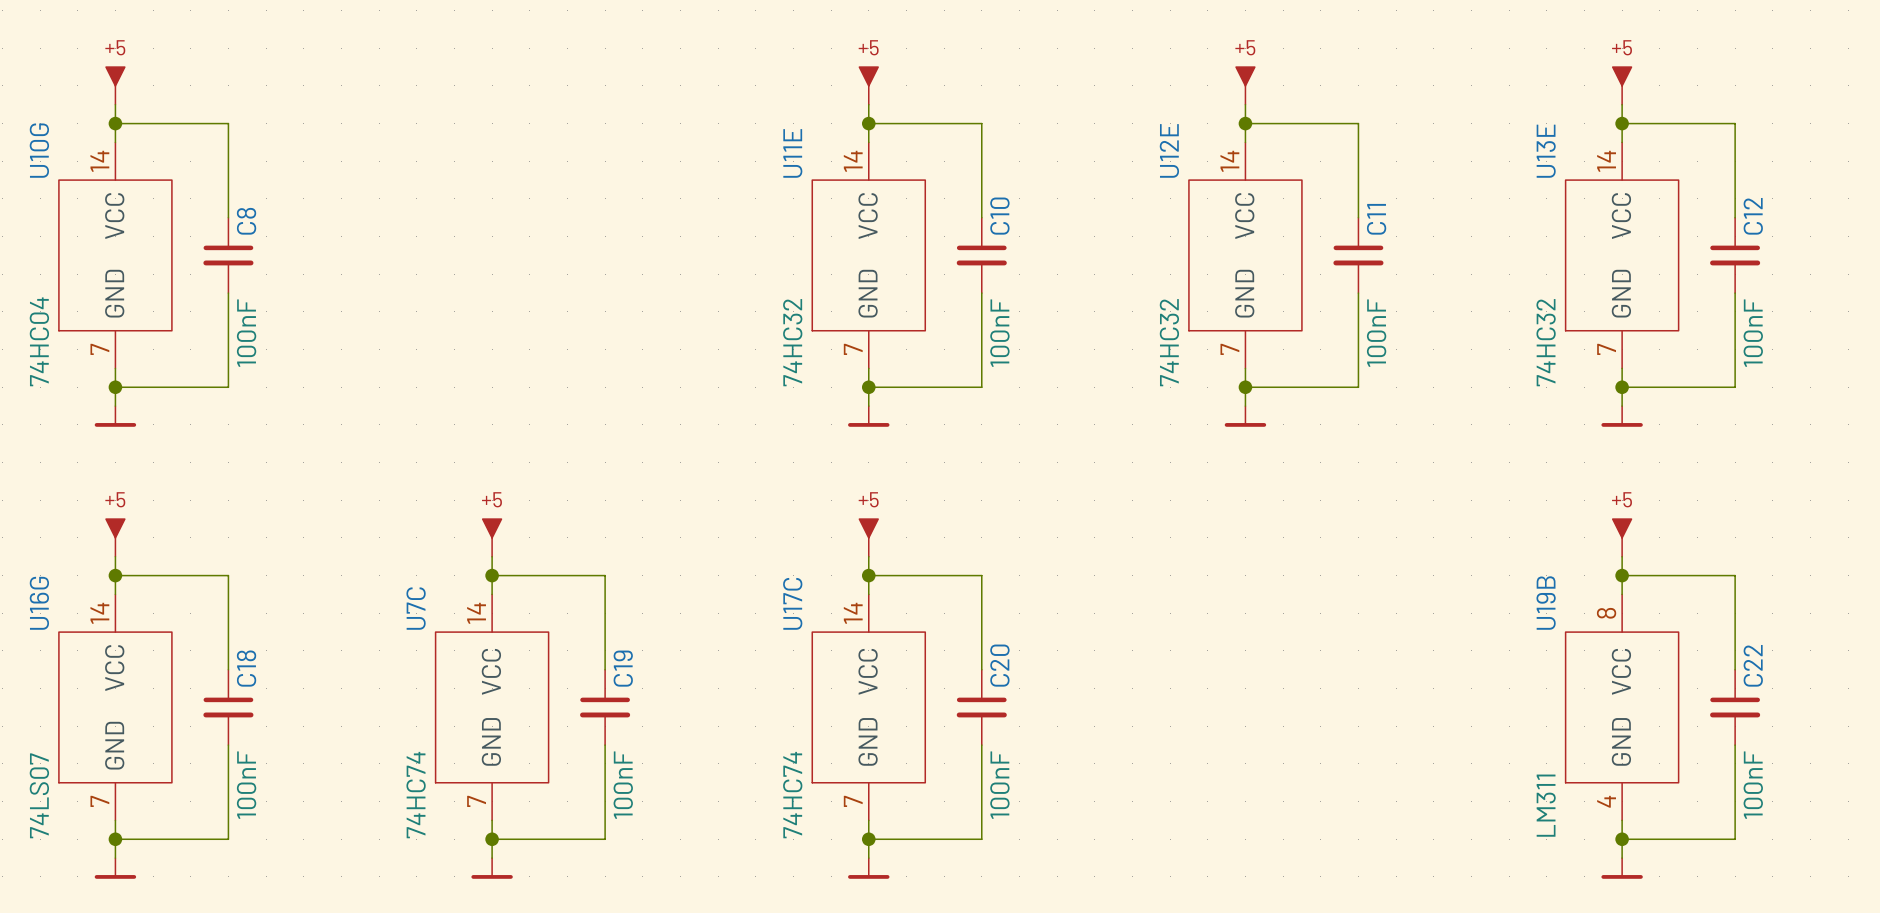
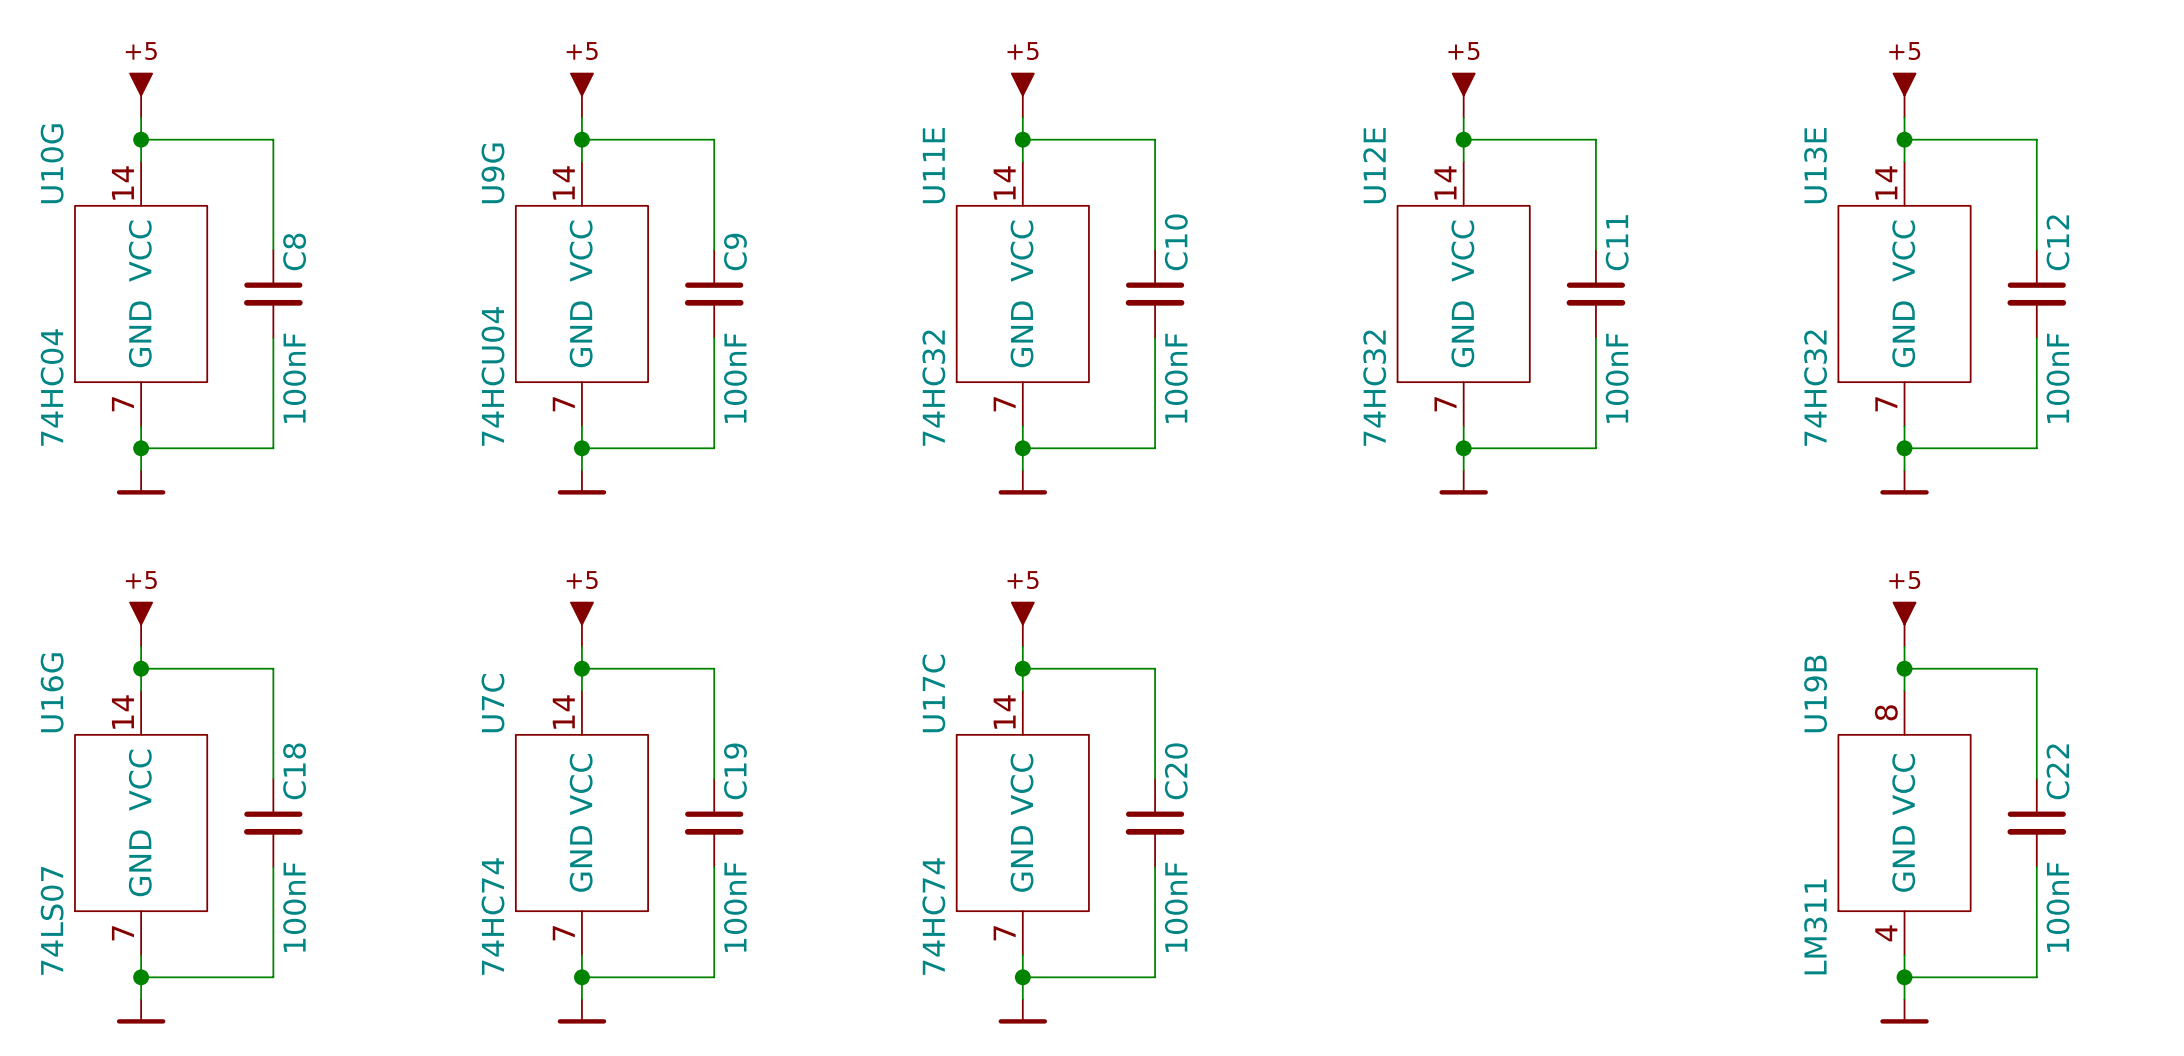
power symbol: none -> (581, 95)
wire: none -> (581, 117) (581, 161)
wire: none -> (581, 139) (714, 139) (714, 249)
junction: none -> (581, 139)
U9G: none -> 74HCU04 (581, 293)
C9: none -> 100nF (714, 293)
wire: none -> (714, 338) (714, 448) (581, 448)
wire: none -> (581, 426) (581, 470)
junction: none -> (581, 448)
power symbol: none -> (581, 482)

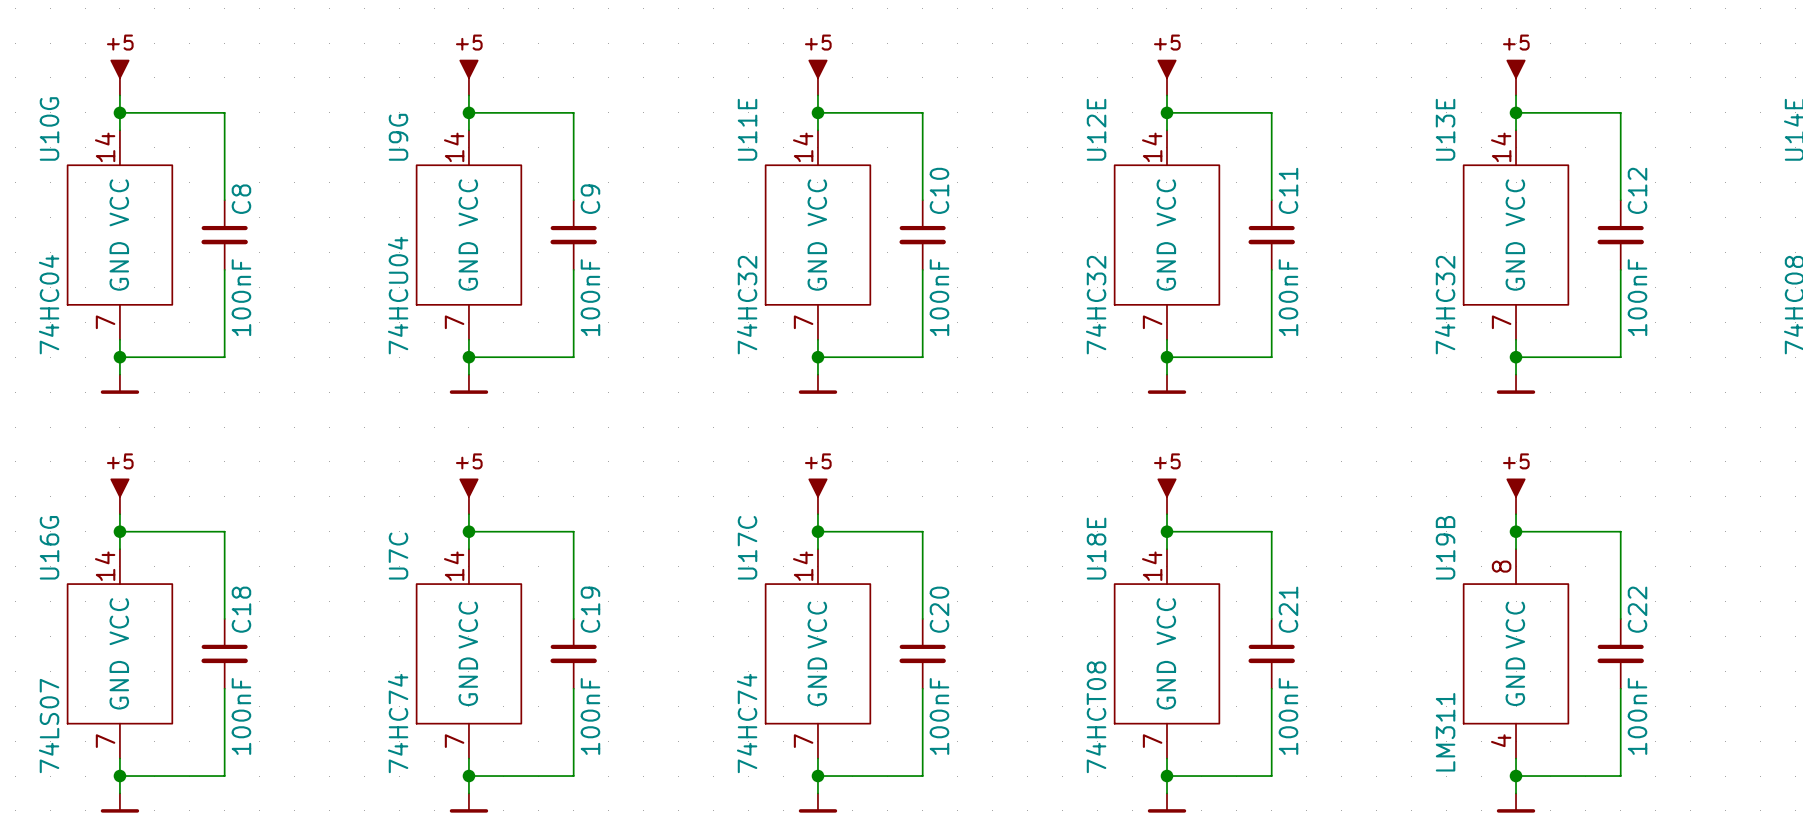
power symbol: none -> (1166, 496)
wire: none -> (1166, 514) (1166, 549)
wire: none -> (1166, 531) (1271, 531) (1271, 618)
junction: none -> (1166, 531)
U18E: none -> 74HCT08 (1166, 653)
C21: none -> 100nF (1271, 653)
wire: none -> (1271, 688) (1271, 776) (1166, 776)
wire: none -> (1166, 758) (1166, 793)
junction: none -> (1166, 776)
power symbol: none -> (1166, 803)

